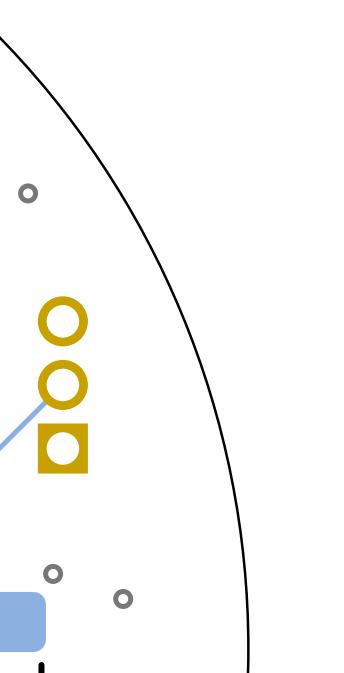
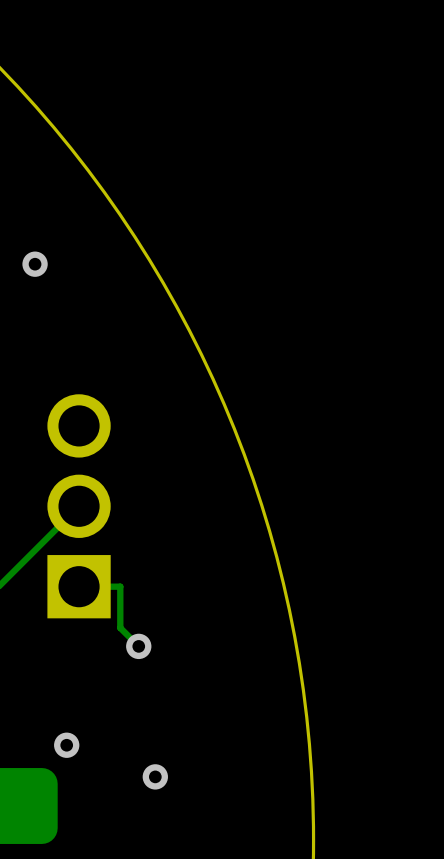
track: none -> (79, 586) (120, 586) (120, 627) (138, 646)
via: none -> (138, 646)

